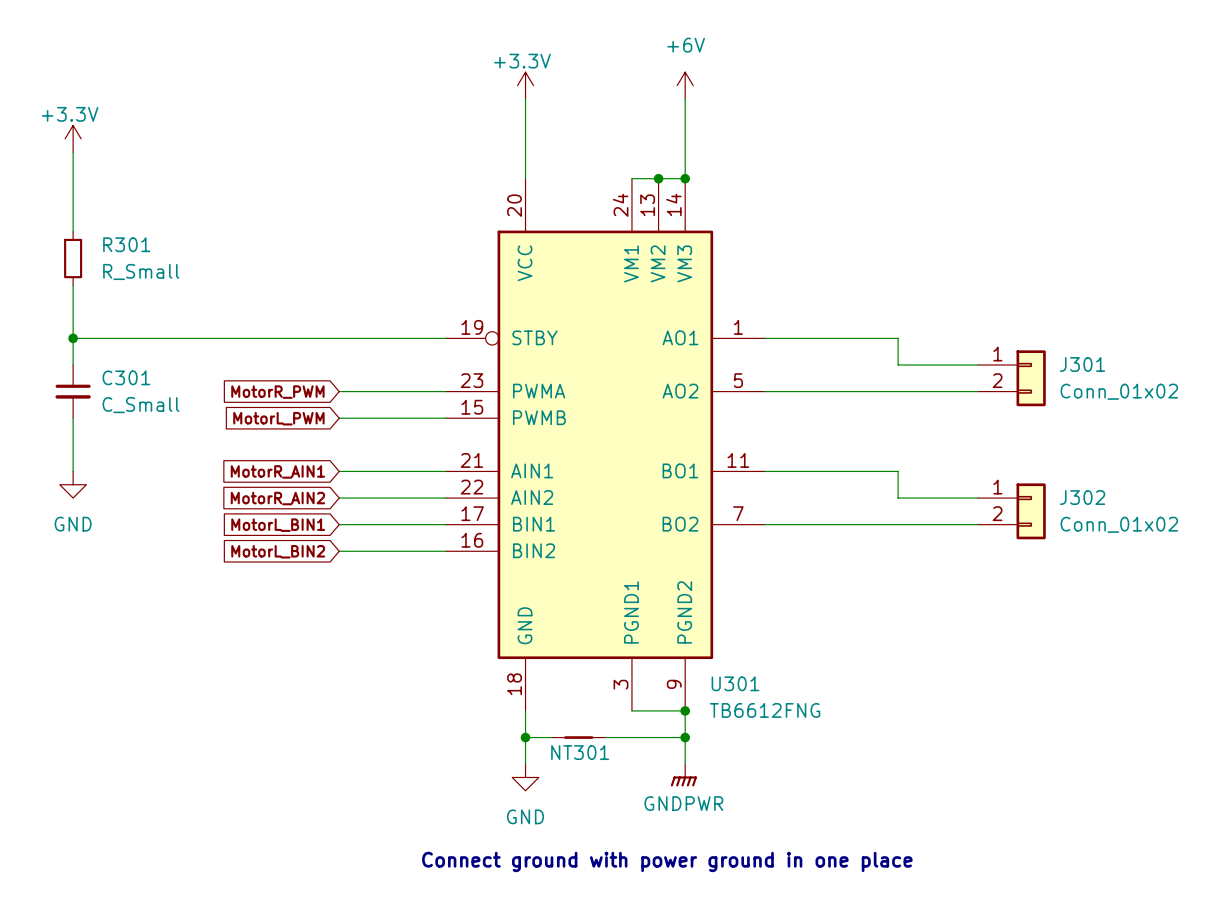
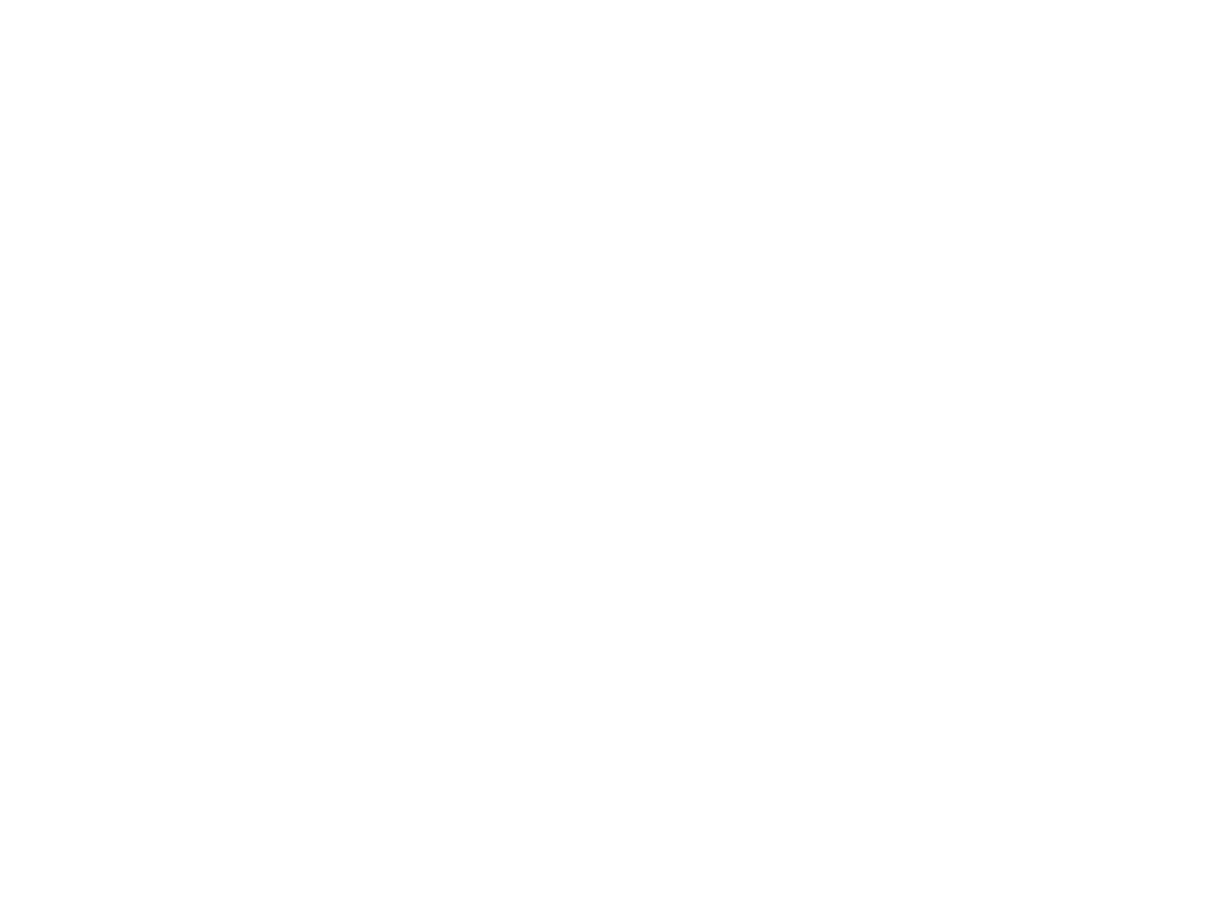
power symbol: +3.3V (525, 85) -> none
power symbol: +6V (685, 85) -> none
wire: (525, 98) (525, 178) -> none
wire: (685, 98) (685, 178) (631, 178) -> none
power symbol: +3.3V (73, 138) -> none
wire: (73, 152) (73, 231) -> none
junction: (658, 178) -> none
junction: (685, 178) -> none
R301: R_Small (73, 258) -> none
wire: (73, 285) (73, 364) -> none
wire: (73, 338) (445, 338) -> none
junction: (73, 338) -> none
wire: (765, 338) (898, 338) (898, 364) (977, 364) -> none
J301: Conn_01x02 (1011, 378) -> none
C301: C_Small (73, 391) -> none
wire: (339, 391) (445, 391) -> none
wire: (765, 391) (977, 391) -> none
global label: MotorR_PWM (277, 392) -> none
wire: (73, 418) (73, 471) -> none
global label: MotorL_PWM (278, 418) -> none
wire: (339, 418) (445, 418) -> none
U301: TB6612FNG (605, 444) -> none
global label: MotorR_AIN1 (277, 471) -> none
wire: (339, 471) (445, 471) -> none
wire: (765, 471) (898, 471) (898, 498) (977, 498) -> none
power symbol: GND (73, 484) -> none
global label: MotorR_AIN2 (277, 498) -> none
wire: (339, 498) (445, 498) -> none
J302: Conn_01x02 (1011, 511) -> none
wire: (339, 524) (445, 524) -> none
wire: (765, 524) (977, 524) -> none
global label: MotorL_BIN1 (278, 525) -> none
global label: MotorL_BIN2 (278, 551) -> none
wire: (339, 551) (445, 551) -> none
wire: (525, 710) (525, 764) -> none
wire: (631, 710) (685, 710) (685, 764) -> none
junction: (685, 710) -> none
wire: (525, 737) (552, 737) -> none
junction: (525, 737) -> none
NT301: (578, 737) -> none
wire: (605, 737) (685, 737) -> none
junction: (685, 737) -> none
power symbol: GNDPWR (683, 775) -> none
power symbol: GND (525, 777) -> none
text: Connect ground with power ground in one place (667, 861) -> none

